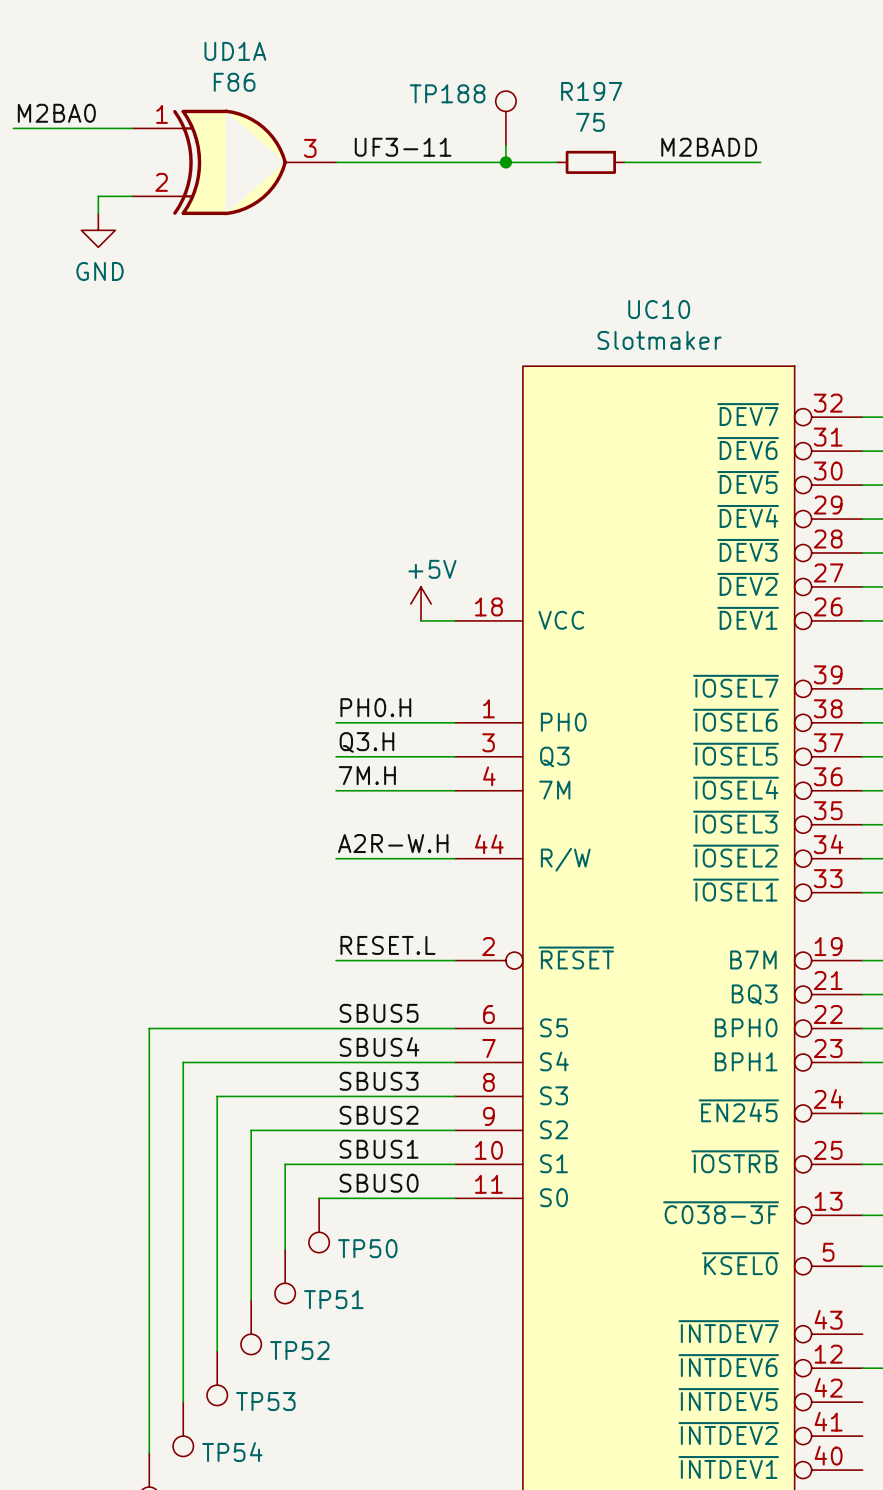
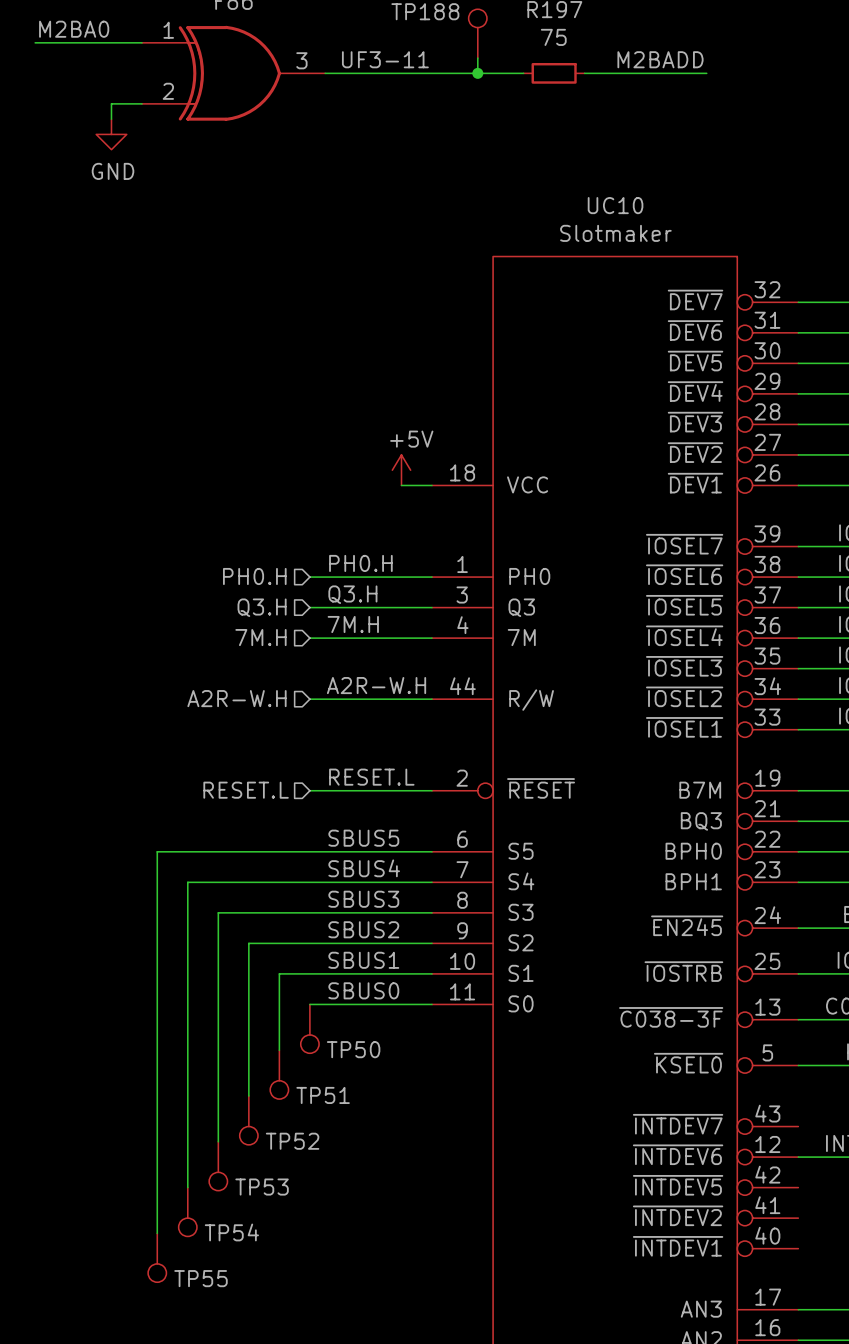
hierarchical label: none -> PH0.H (254, 576)
wire: none -> (309, 577) (325, 577)
hierarchical label: none -> Q3.H (262, 607)
wire: none -> (309, 607) (325, 607)
hierarchical label: none -> 7M.H (260, 637)
wire: none -> (309, 638) (325, 638)
hierarchical label: none -> A2R-W.H (236, 698)
wire: none -> (309, 699) (325, 699)
hierarchical label: none -> RESET.L (246, 790)
wire: none -> (309, 790) (325, 790)

